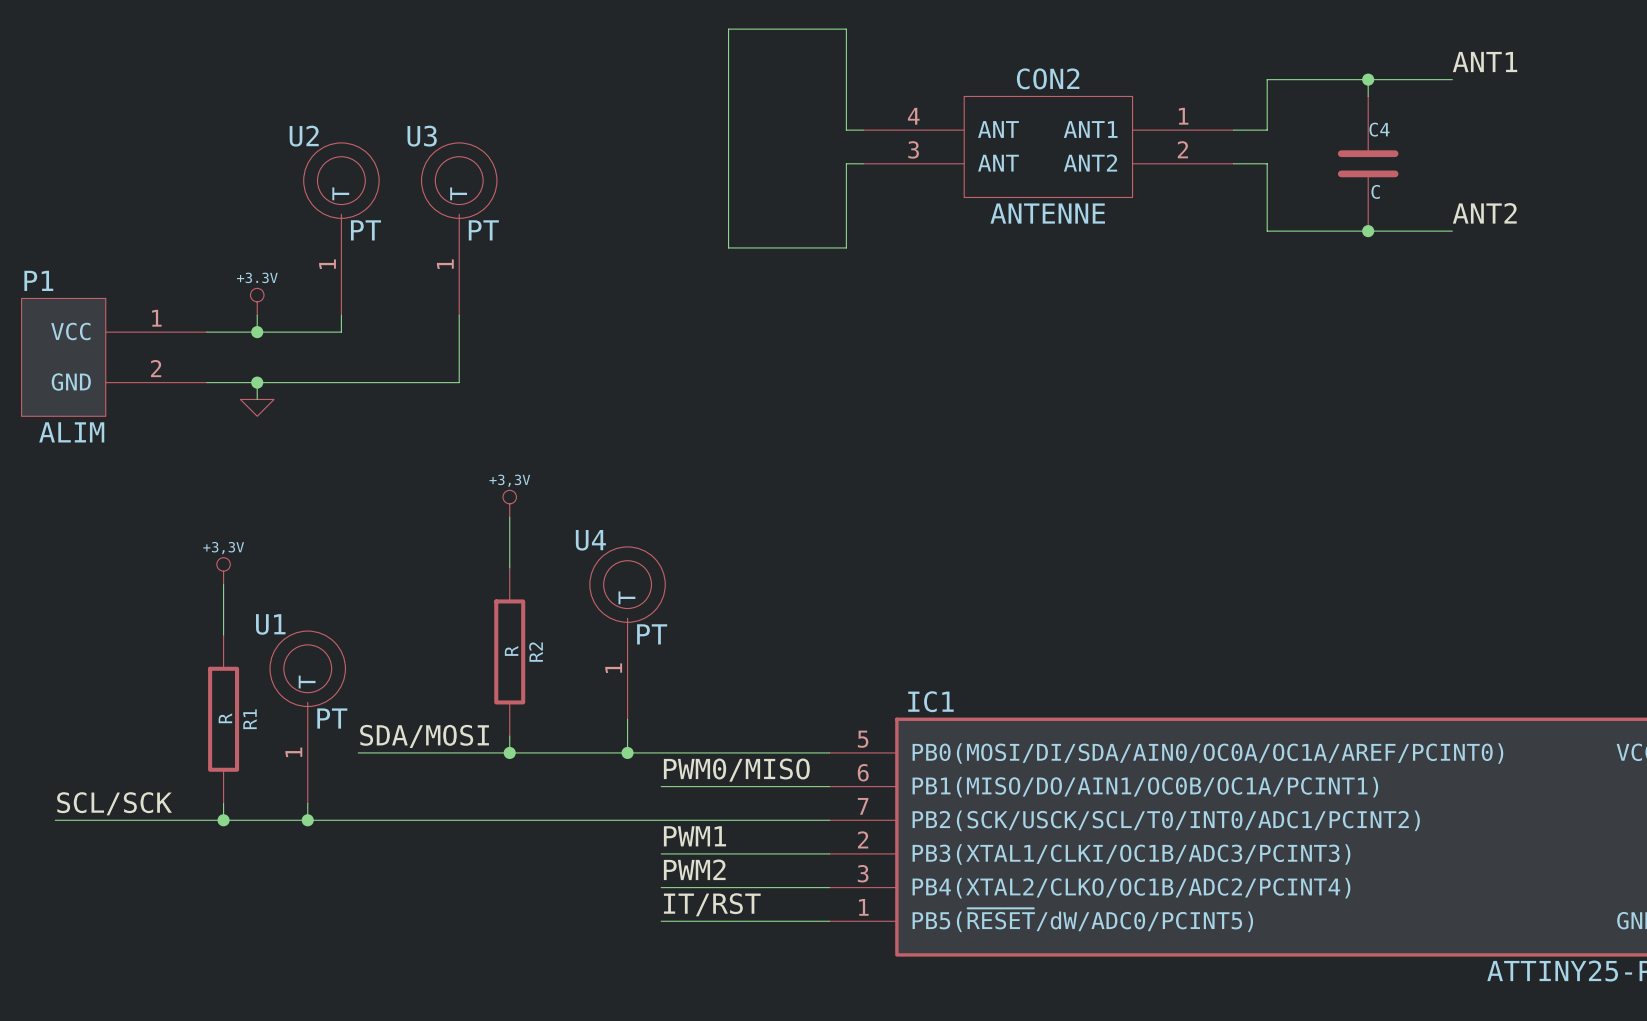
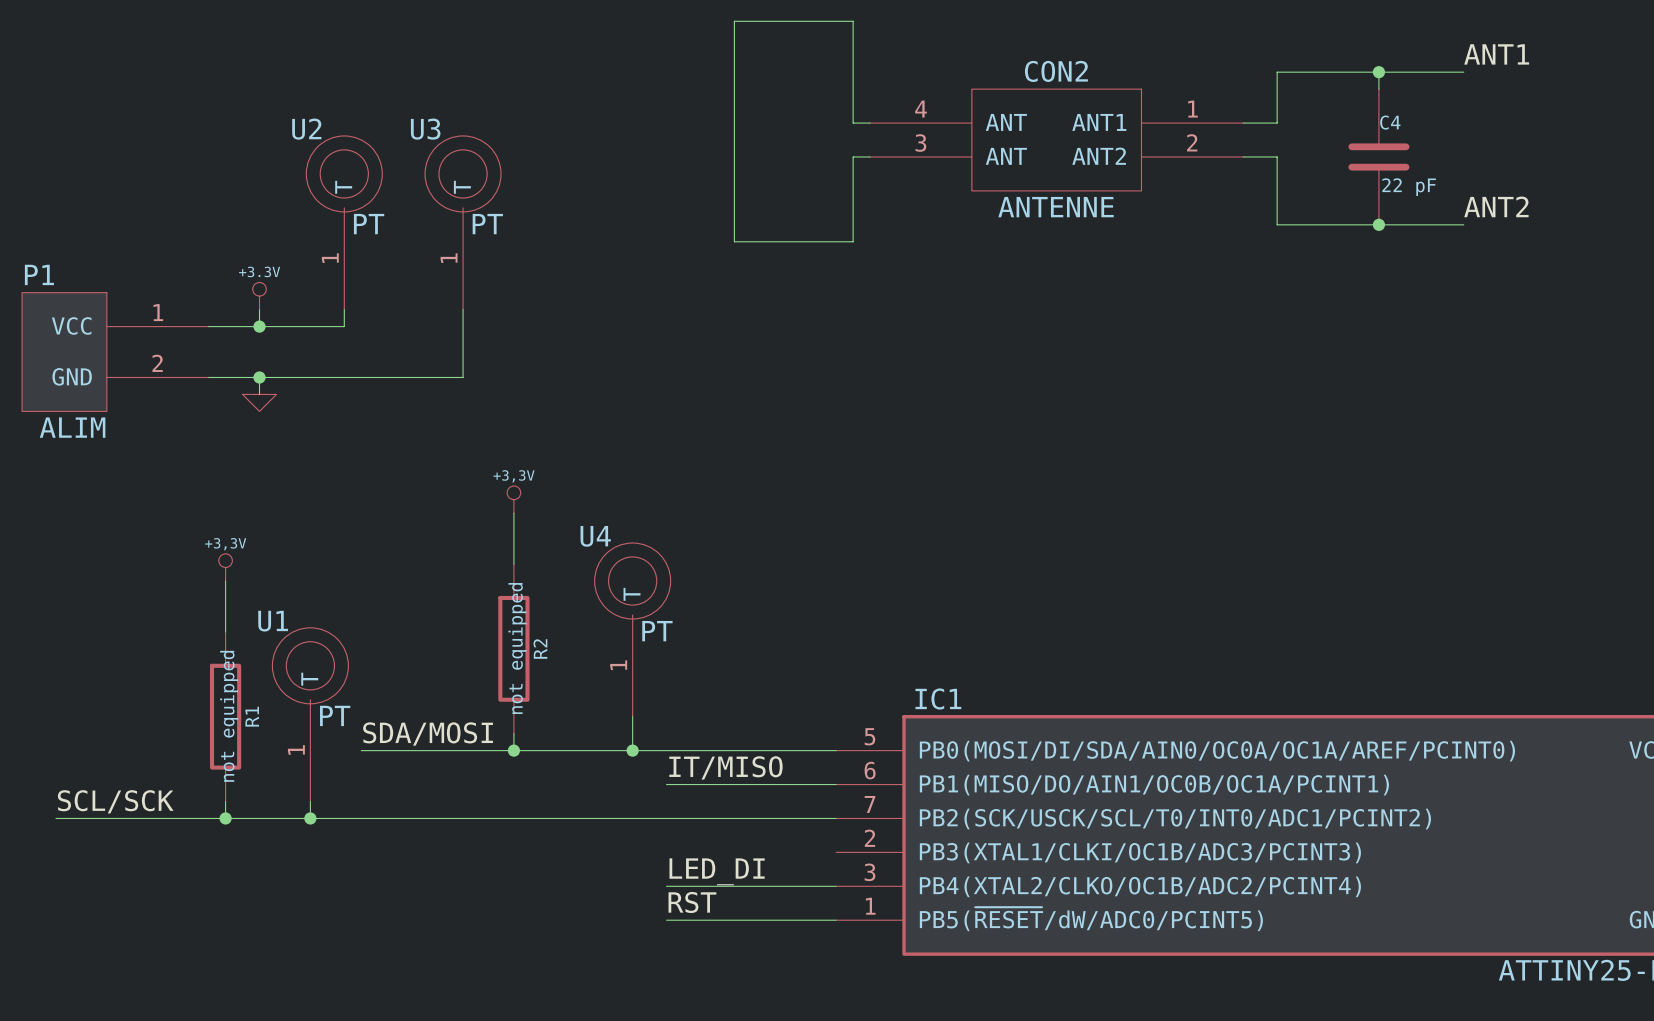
C4 value: C (1375, 191) -> 22 pF (1409, 187)
R2 value: R (511, 650) -> not equipped (517, 648)
R1 value: R (225, 718) -> not equipped (229, 716)
label: PWM0/MISO (736, 770) -> IT/MISO (725, 767)
label: PWM1 (694, 836) -> none
wire: (661, 853) (829, 853) -> none
label: PWM2 (694, 869) -> LED_DI (717, 871)
label: IT/RST (712, 904) -> RST (692, 902)

